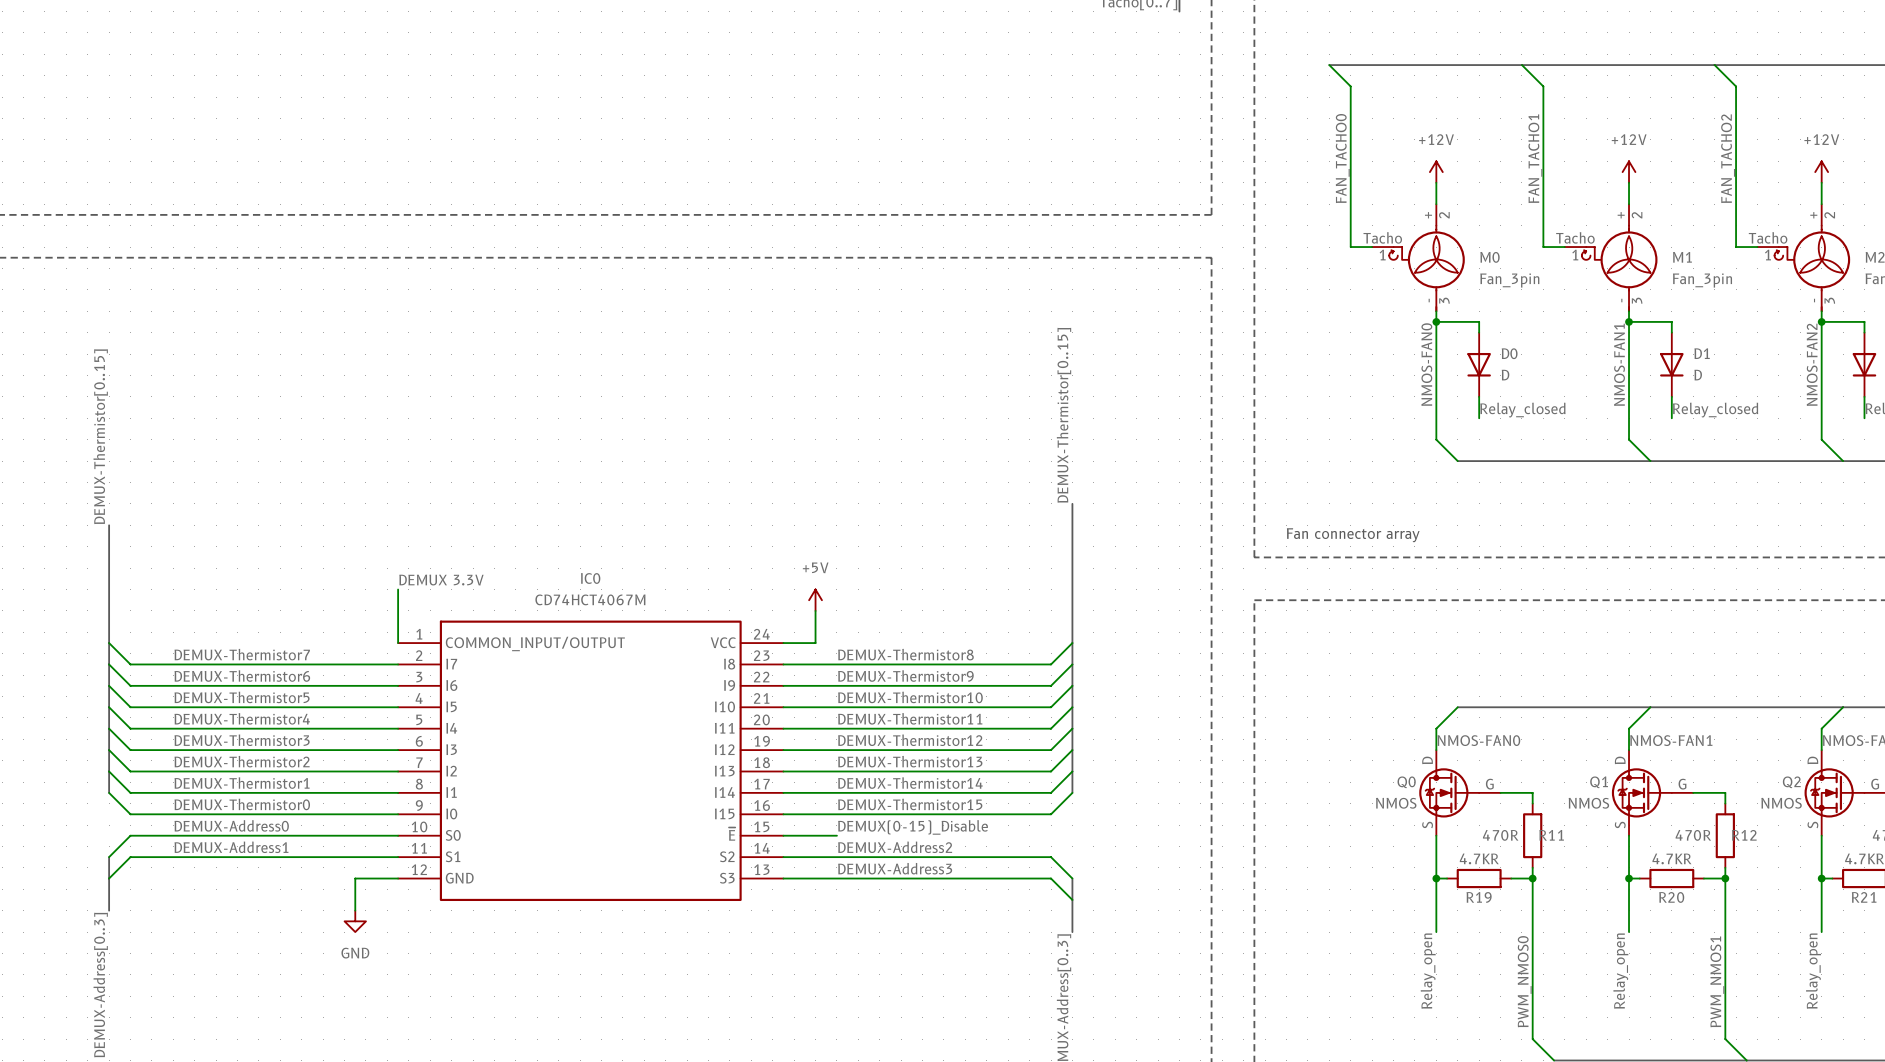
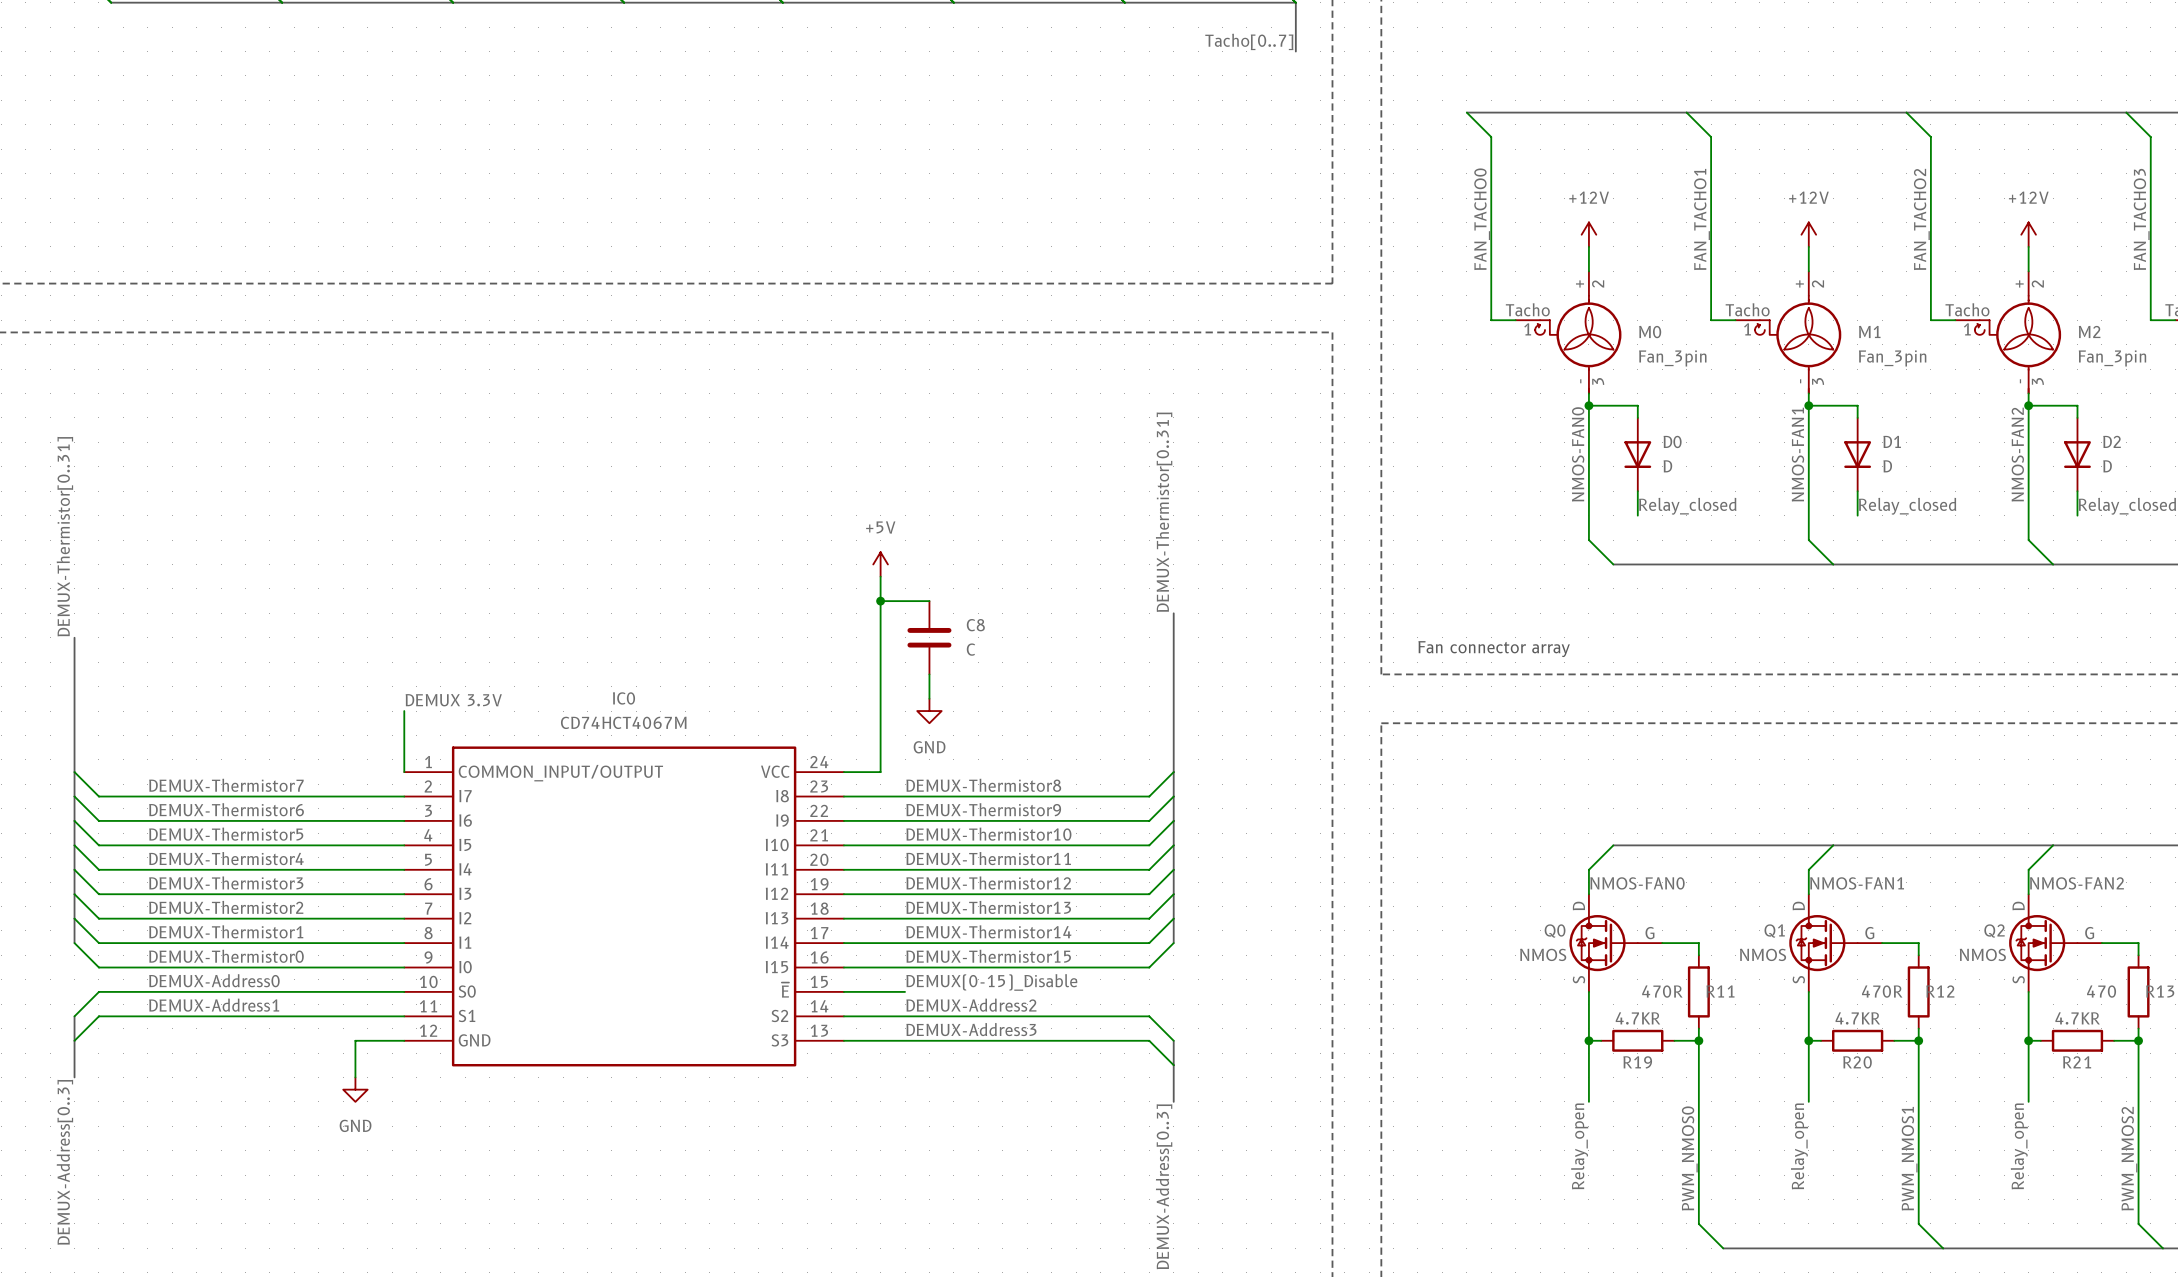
label: DEMUX-Thermistor[0..15] (1063, 415) -> DEMUX-Thermistor[0..31] (1164, 512)
label: DEMUX-Thermistor[0..15] (100, 436) -> DEMUX-Thermistor[0..31] (64, 536)
wire: none -> (880, 576) (880, 735)
wire: none -> (880, 601) (929, 601)
junction: none -> (880, 601)
C8: none -> C (929, 637)
wire: none -> (929, 674) (929, 698)
power symbol: none -> GND (929, 711)
power symbol position: +5V (815, 600) -> +5V (880, 564)

